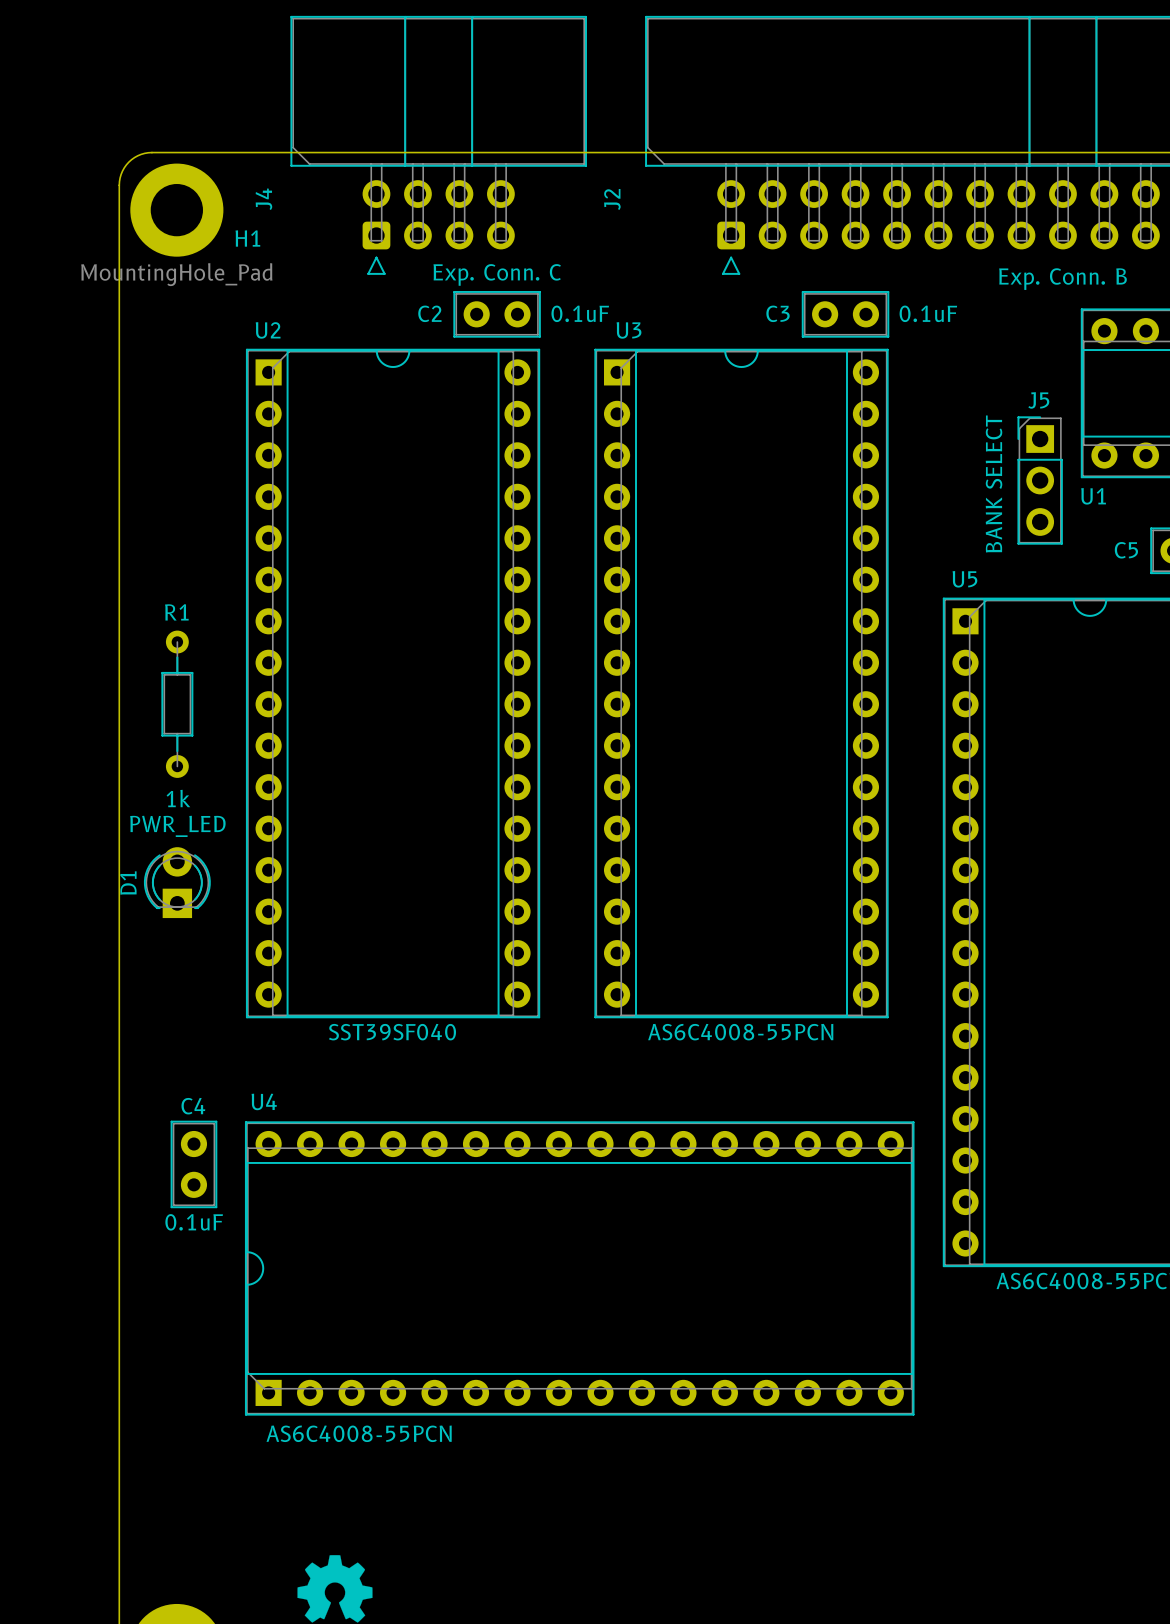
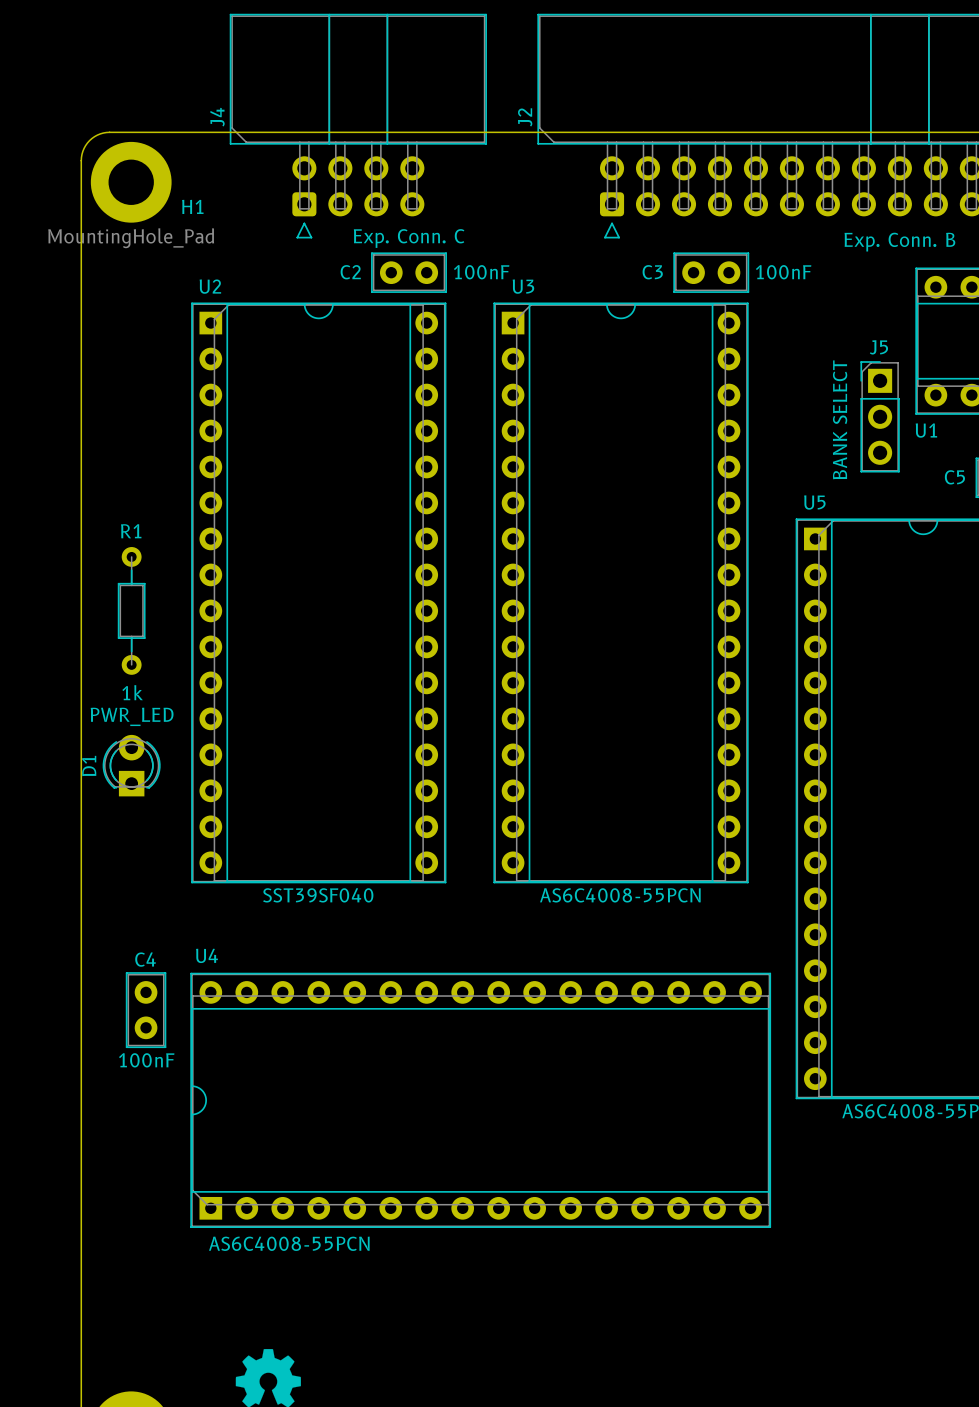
J4 name position: J4 (263, 199) -> J4 (217, 117)
J2 name position: J2 (612, 199) -> J2 (525, 117)
C2 value: 0.1uF (580, 313) -> 100nF (481, 272)
C3 value: 0.1uF (928, 313) -> 100nF (783, 272)
C4 value: 0.1uF (194, 1222) -> 100nF (146, 1060)

